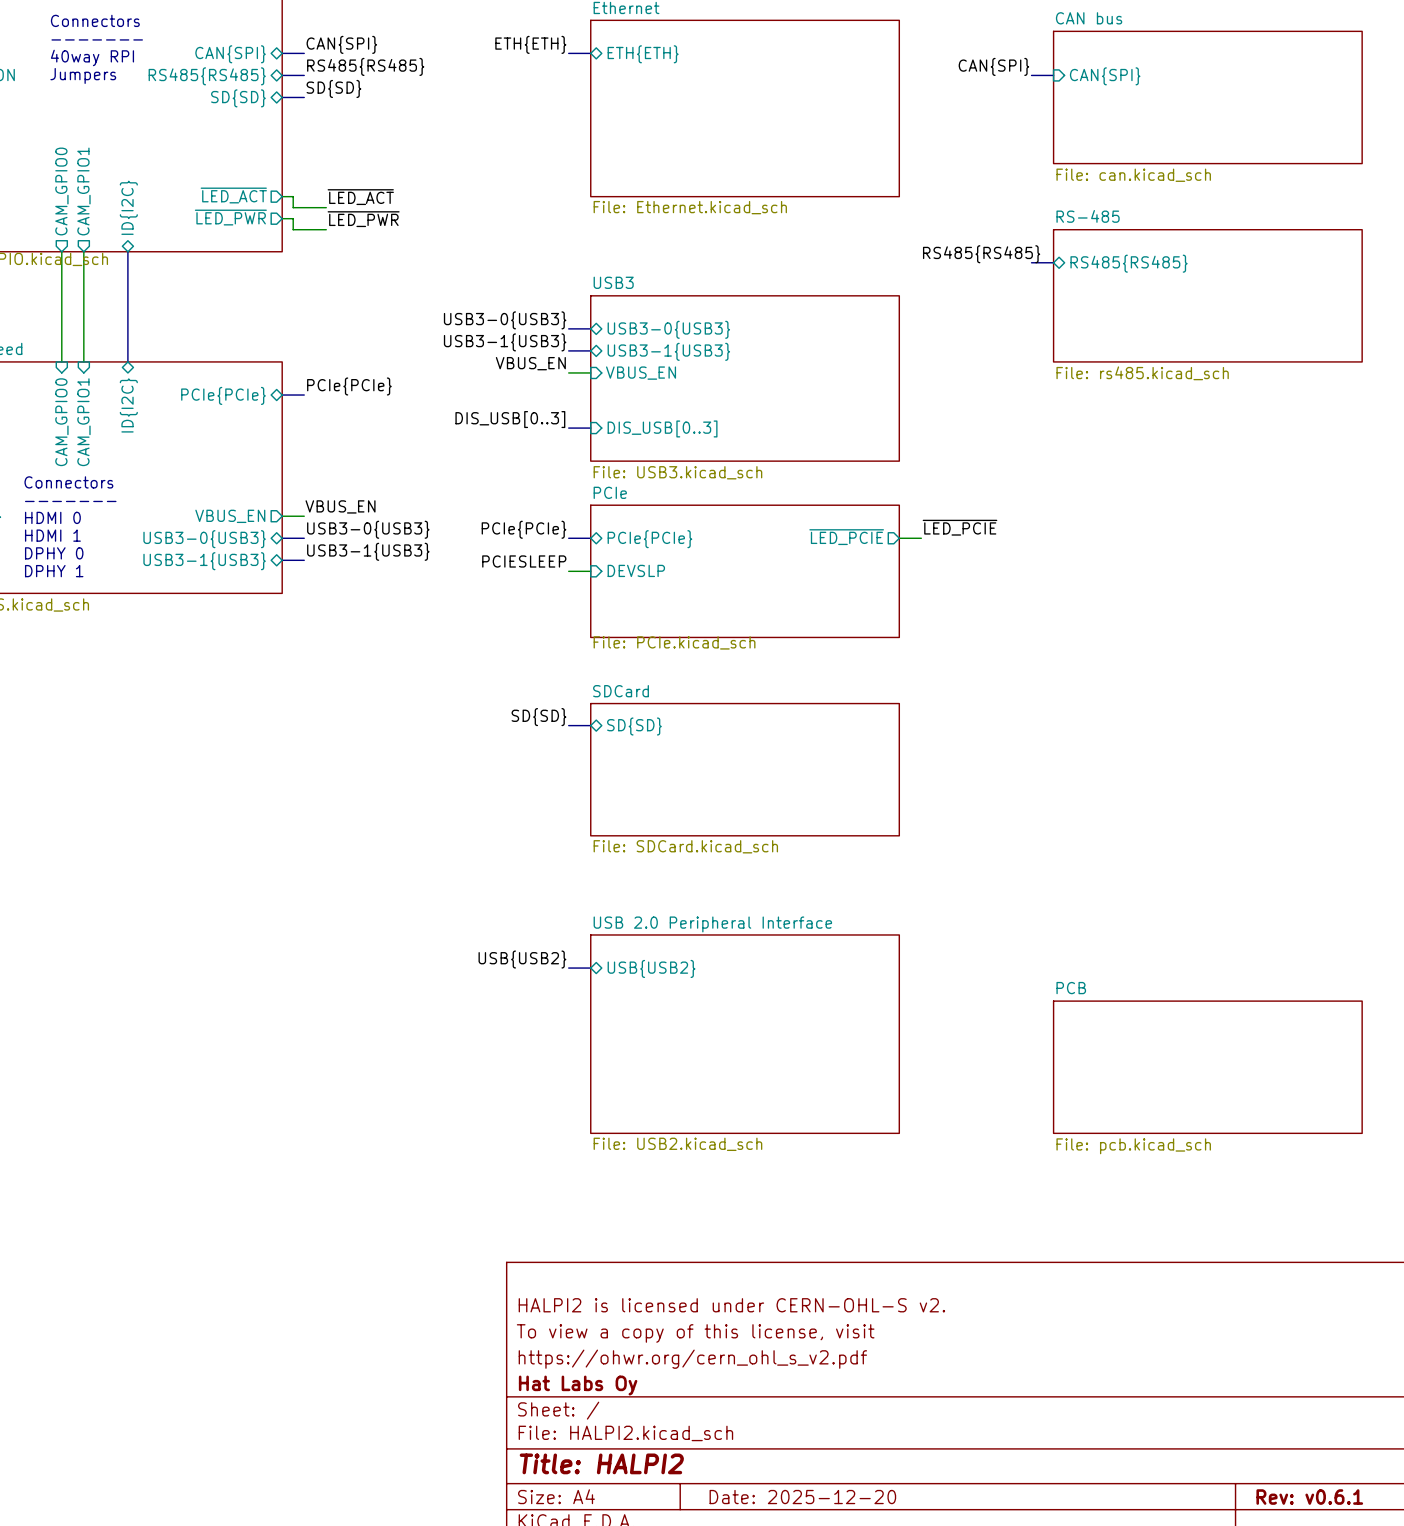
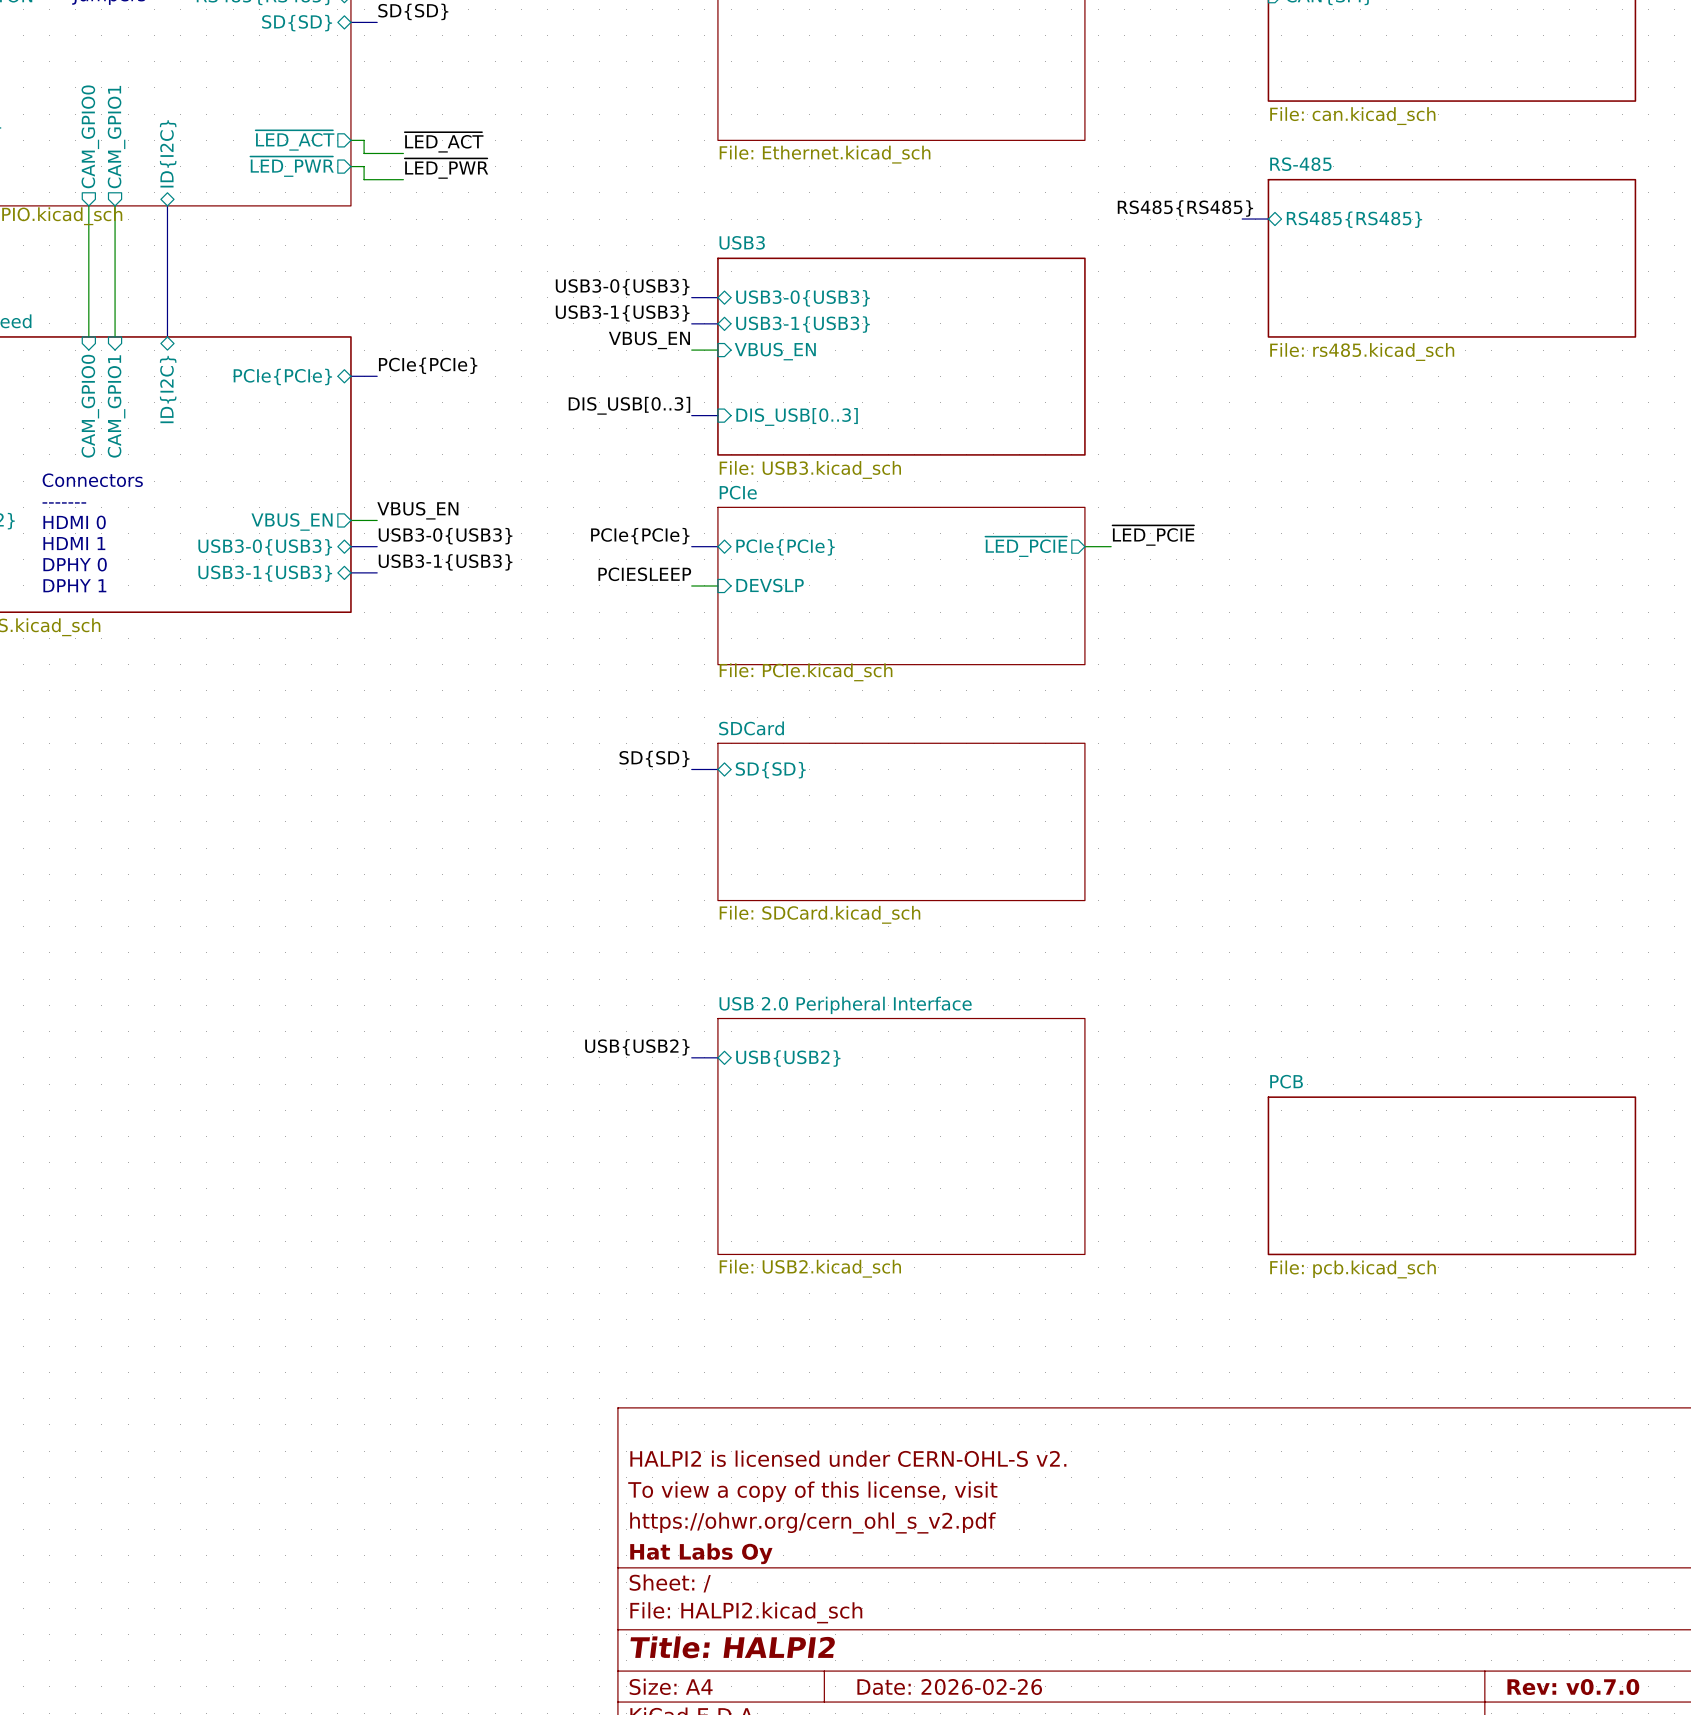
title block: Date: 2025-12-20 (802, 1497) -> Date: 2026-02-26 (949, 1687)
title block: Rev: v0.6.1 (1309, 1497) -> Rev: v0.7.0 (1573, 1687)

